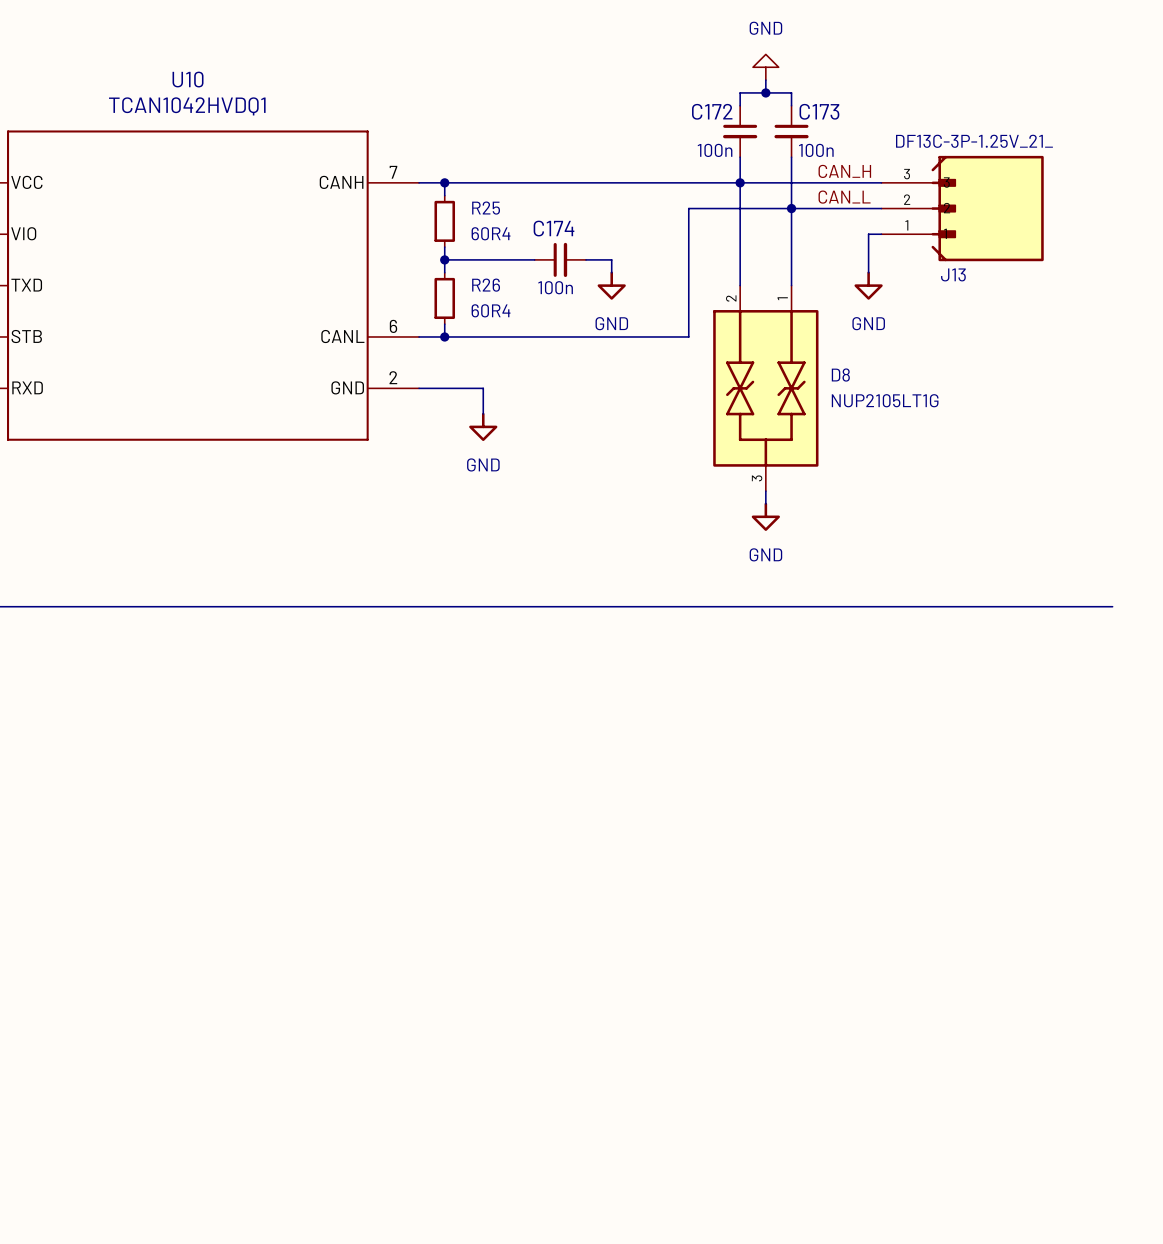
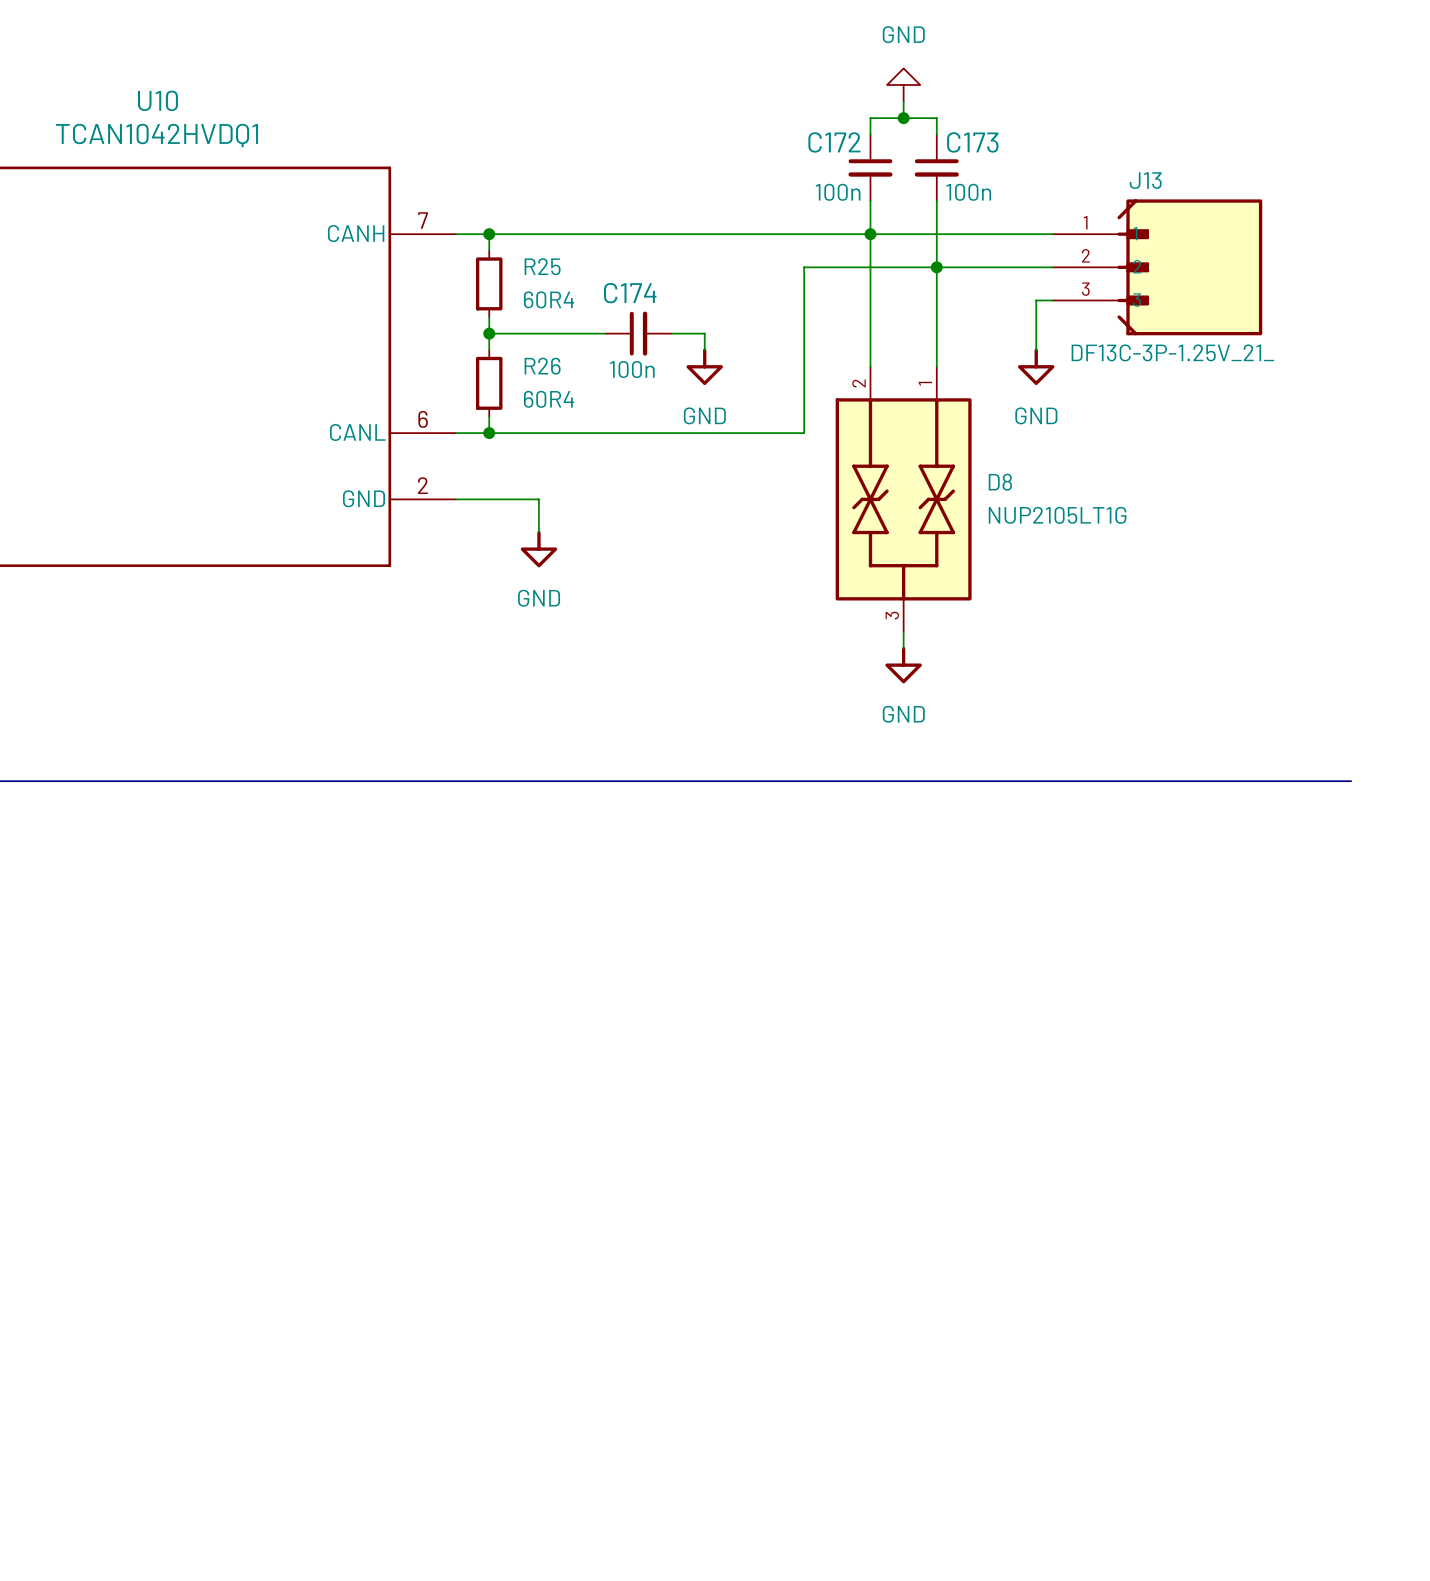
label: CAN_H (844, 171) -> none
label: CAN_L (844, 197) -> none
J13 flip: as is (987, 208) -> up-down (1189, 267)

